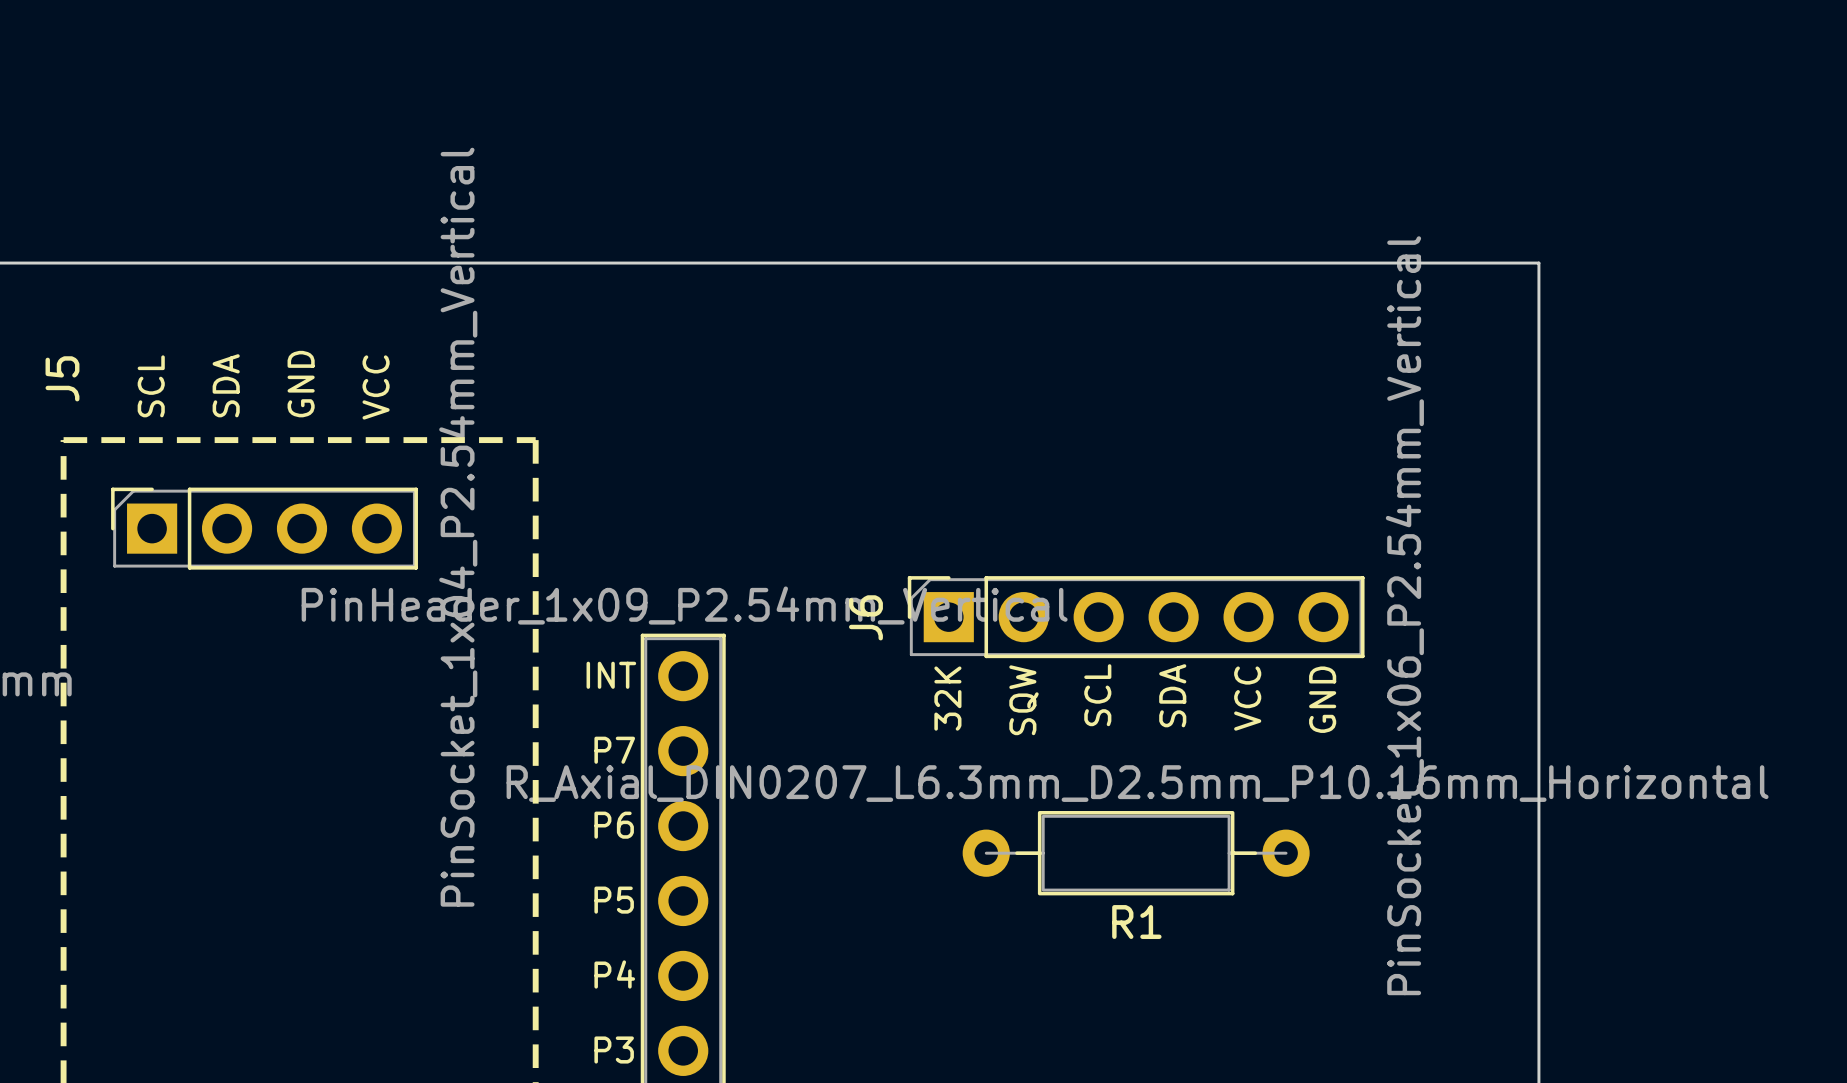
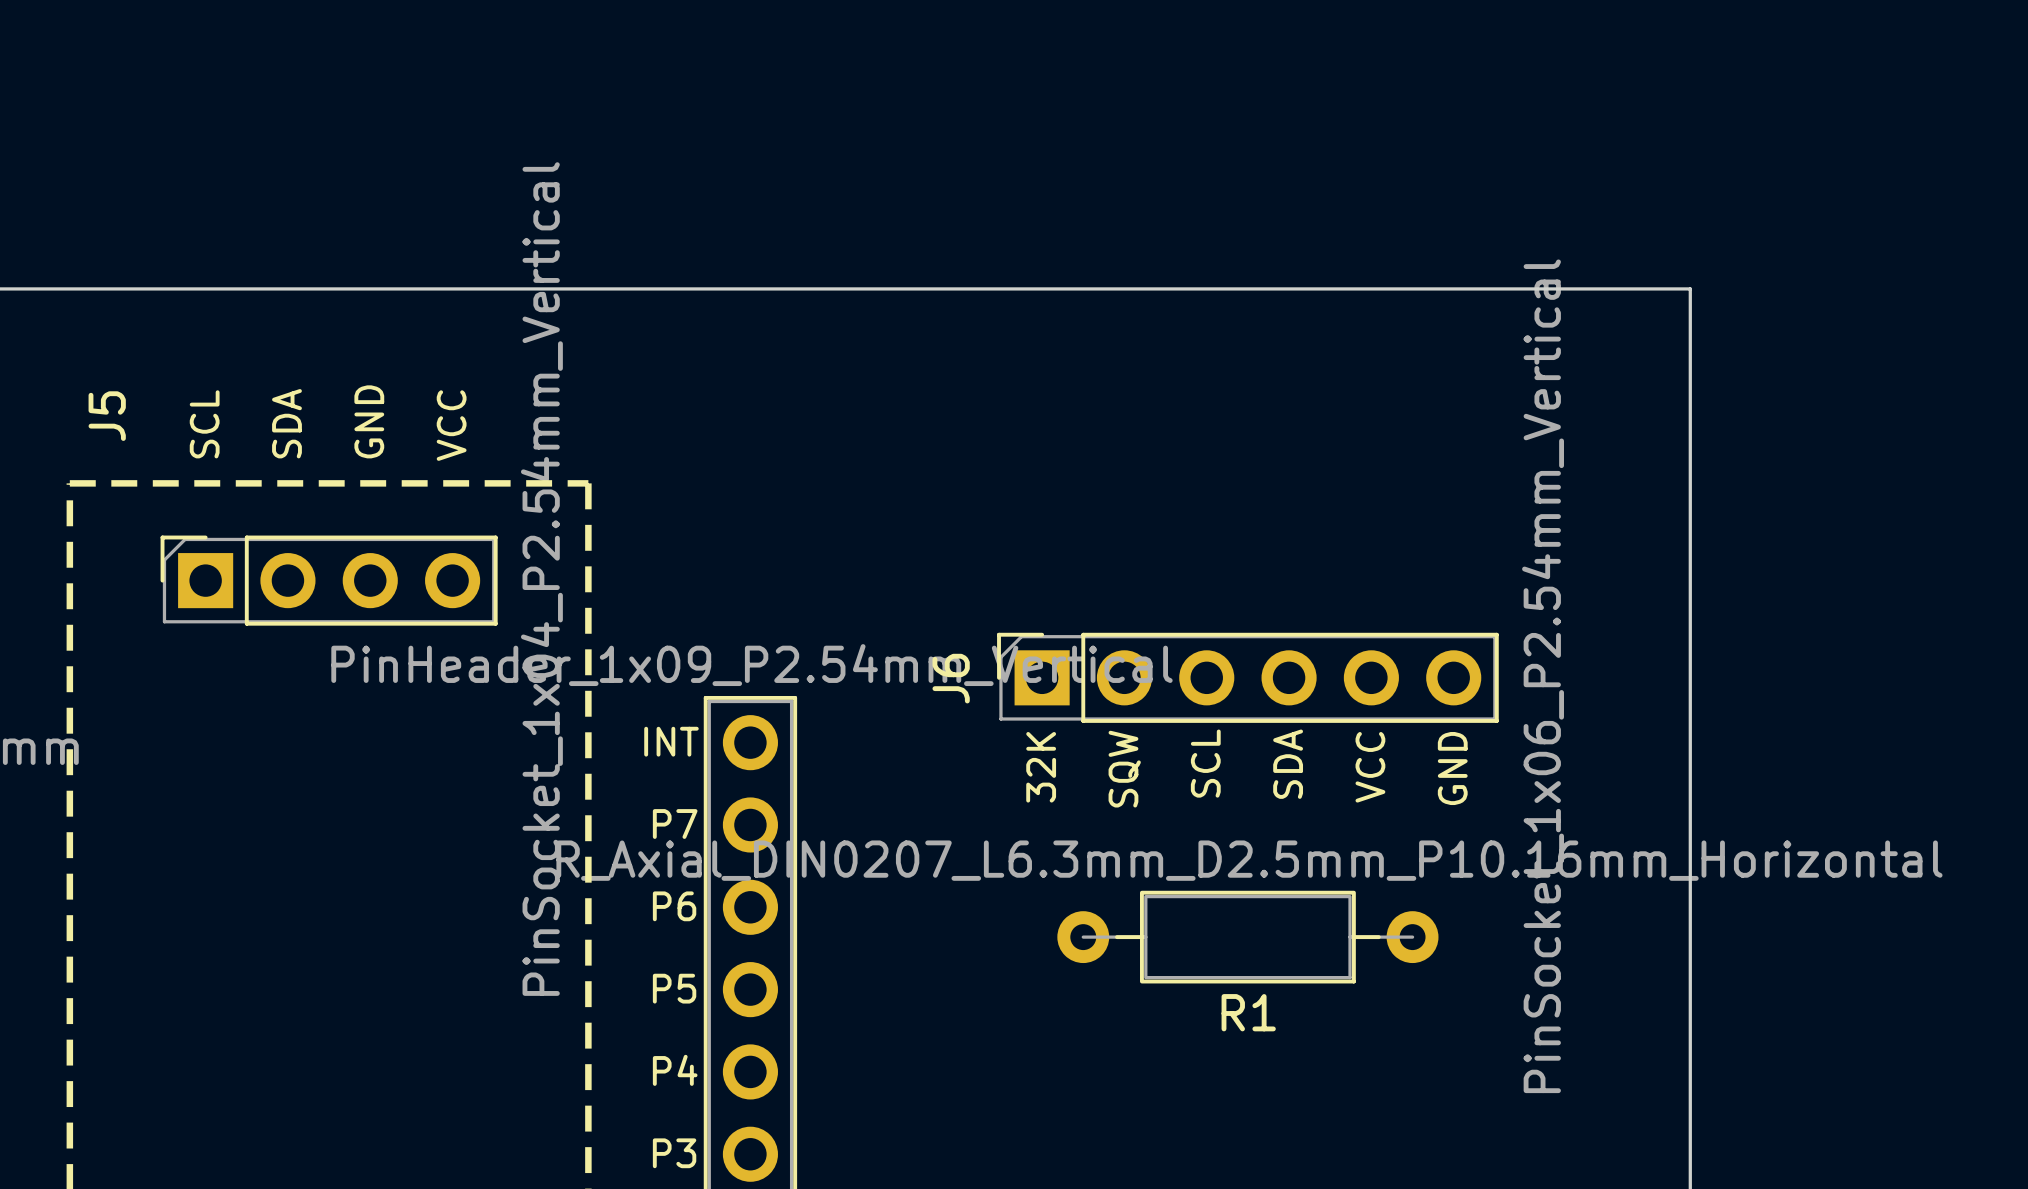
text position: GND (301, 384) -> GND (369, 421)
text position: SDA (226, 385) -> SDA (286, 423)
text position: SCL (151, 386) -> SCL (204, 424)
text position: VCC (376, 387) -> VCC (451, 425)
J5 position: (264, 528) -> (329, 580)

